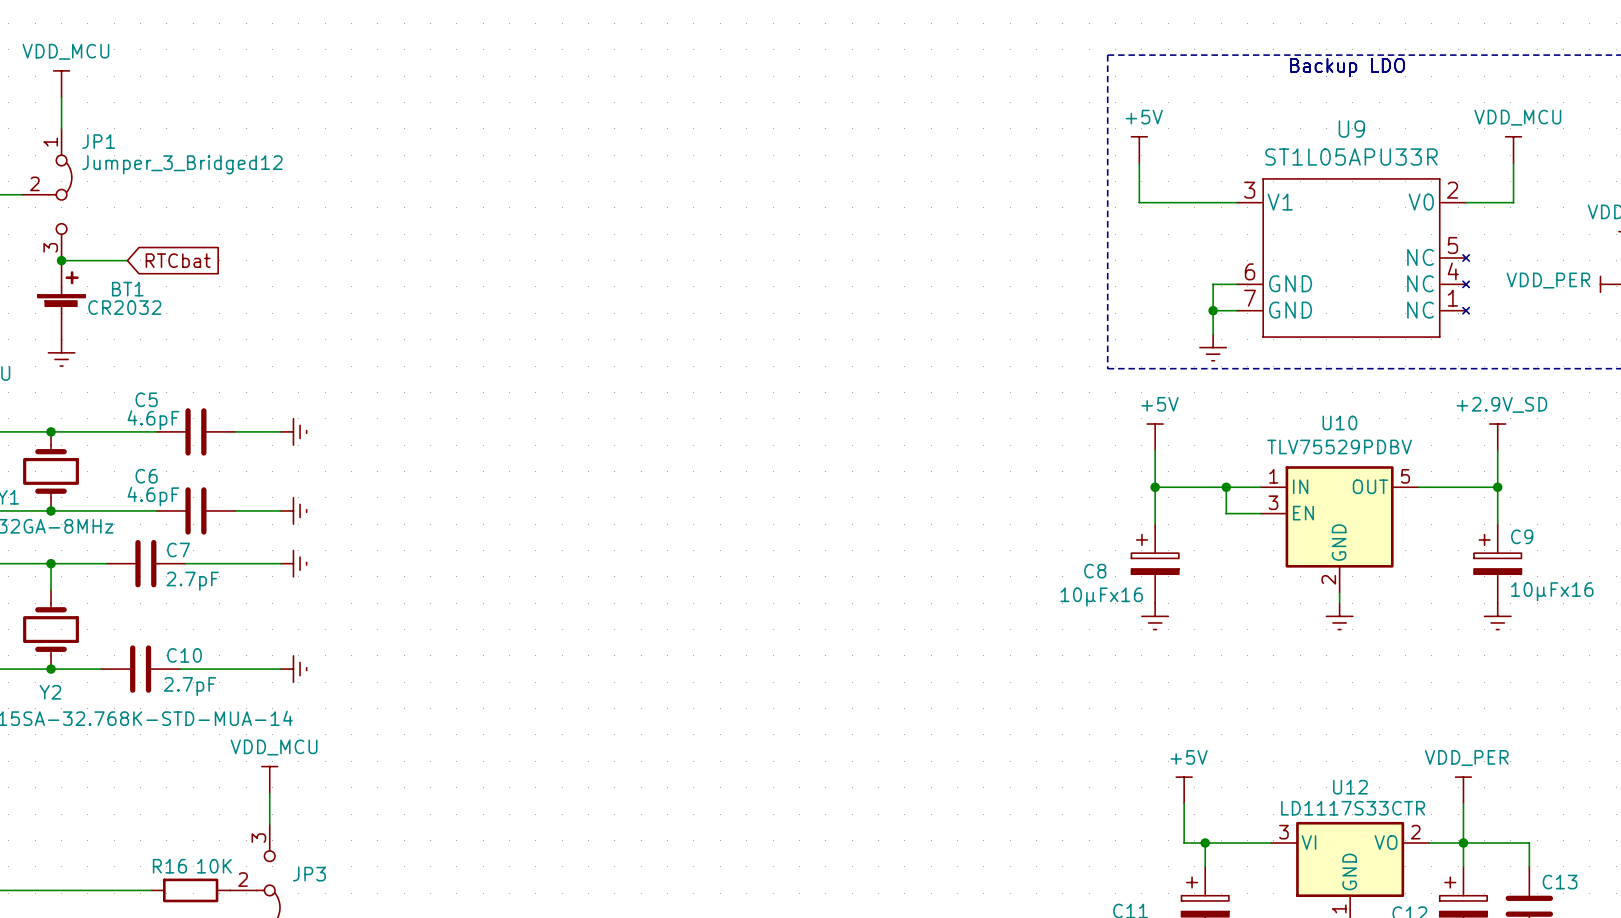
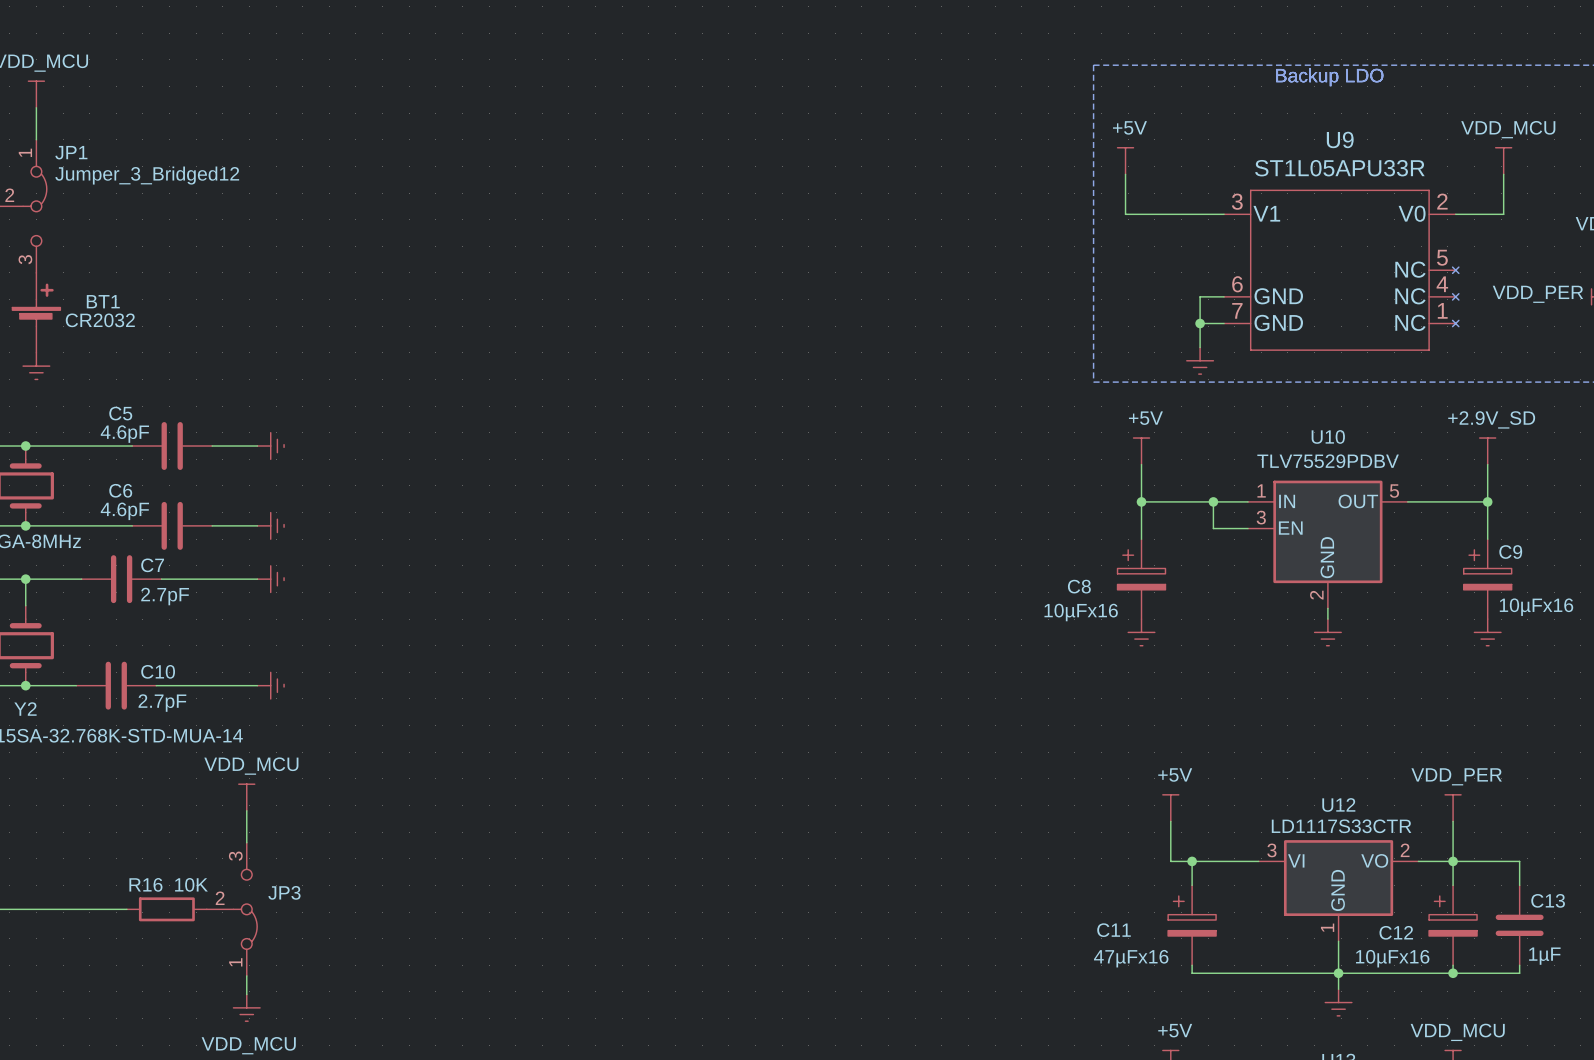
wire: (61, 260) (127, 260) -> none
junction: (61, 260) -> none
global label: RTCbat (178, 260) -> none

